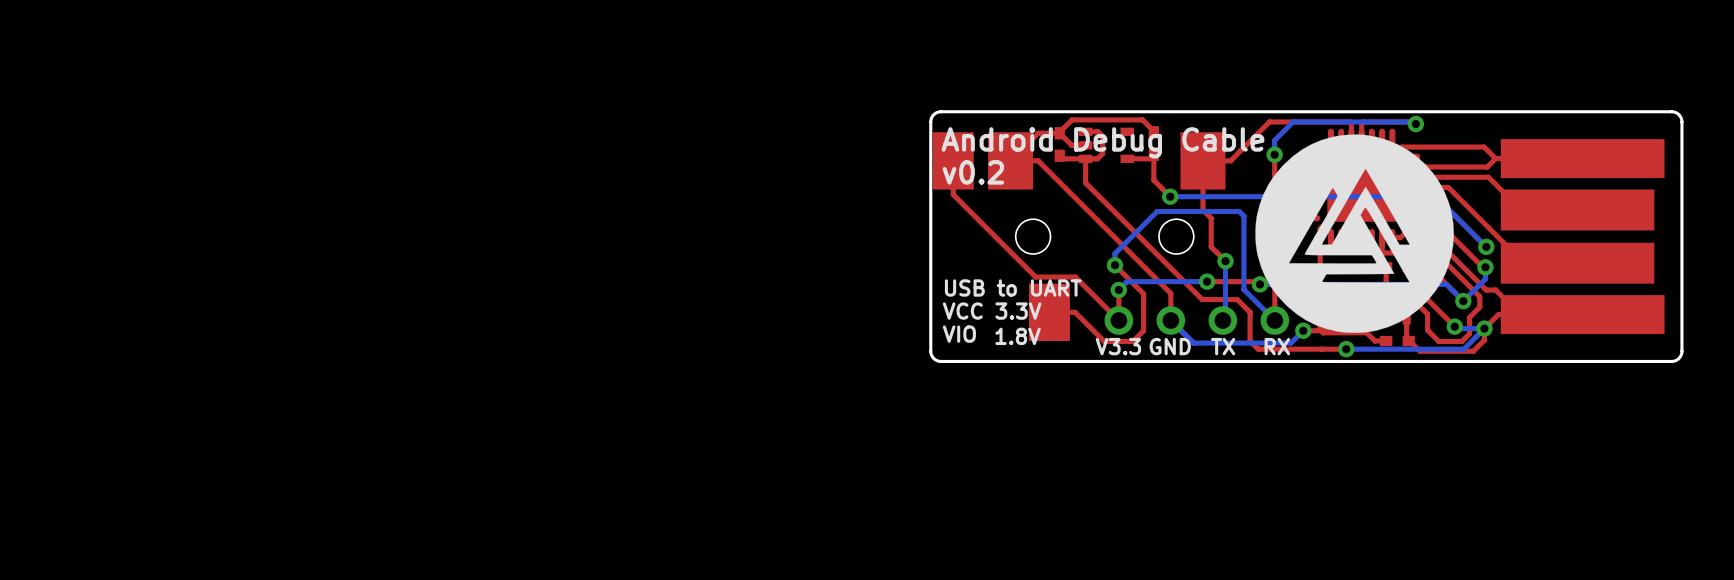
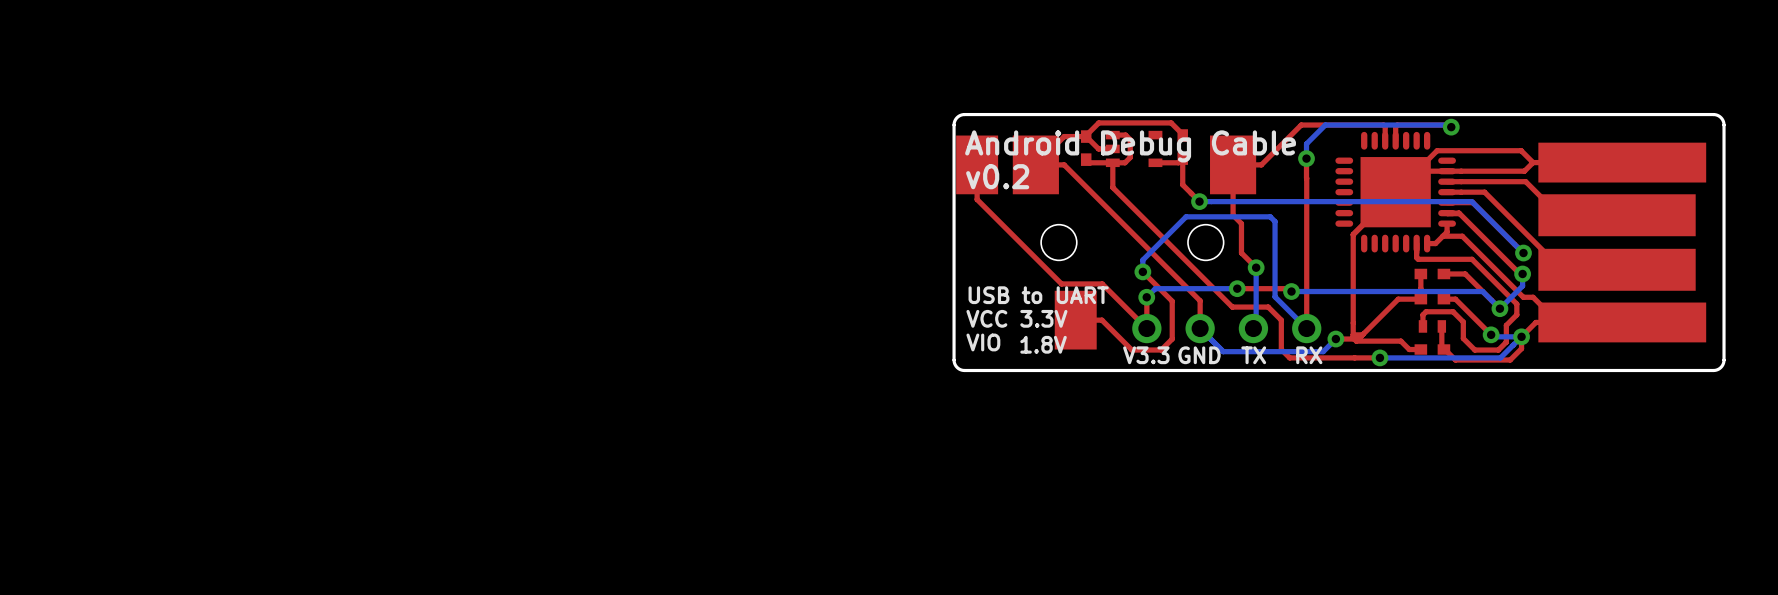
drawing: [1255, 134, 1454, 333] -> none

